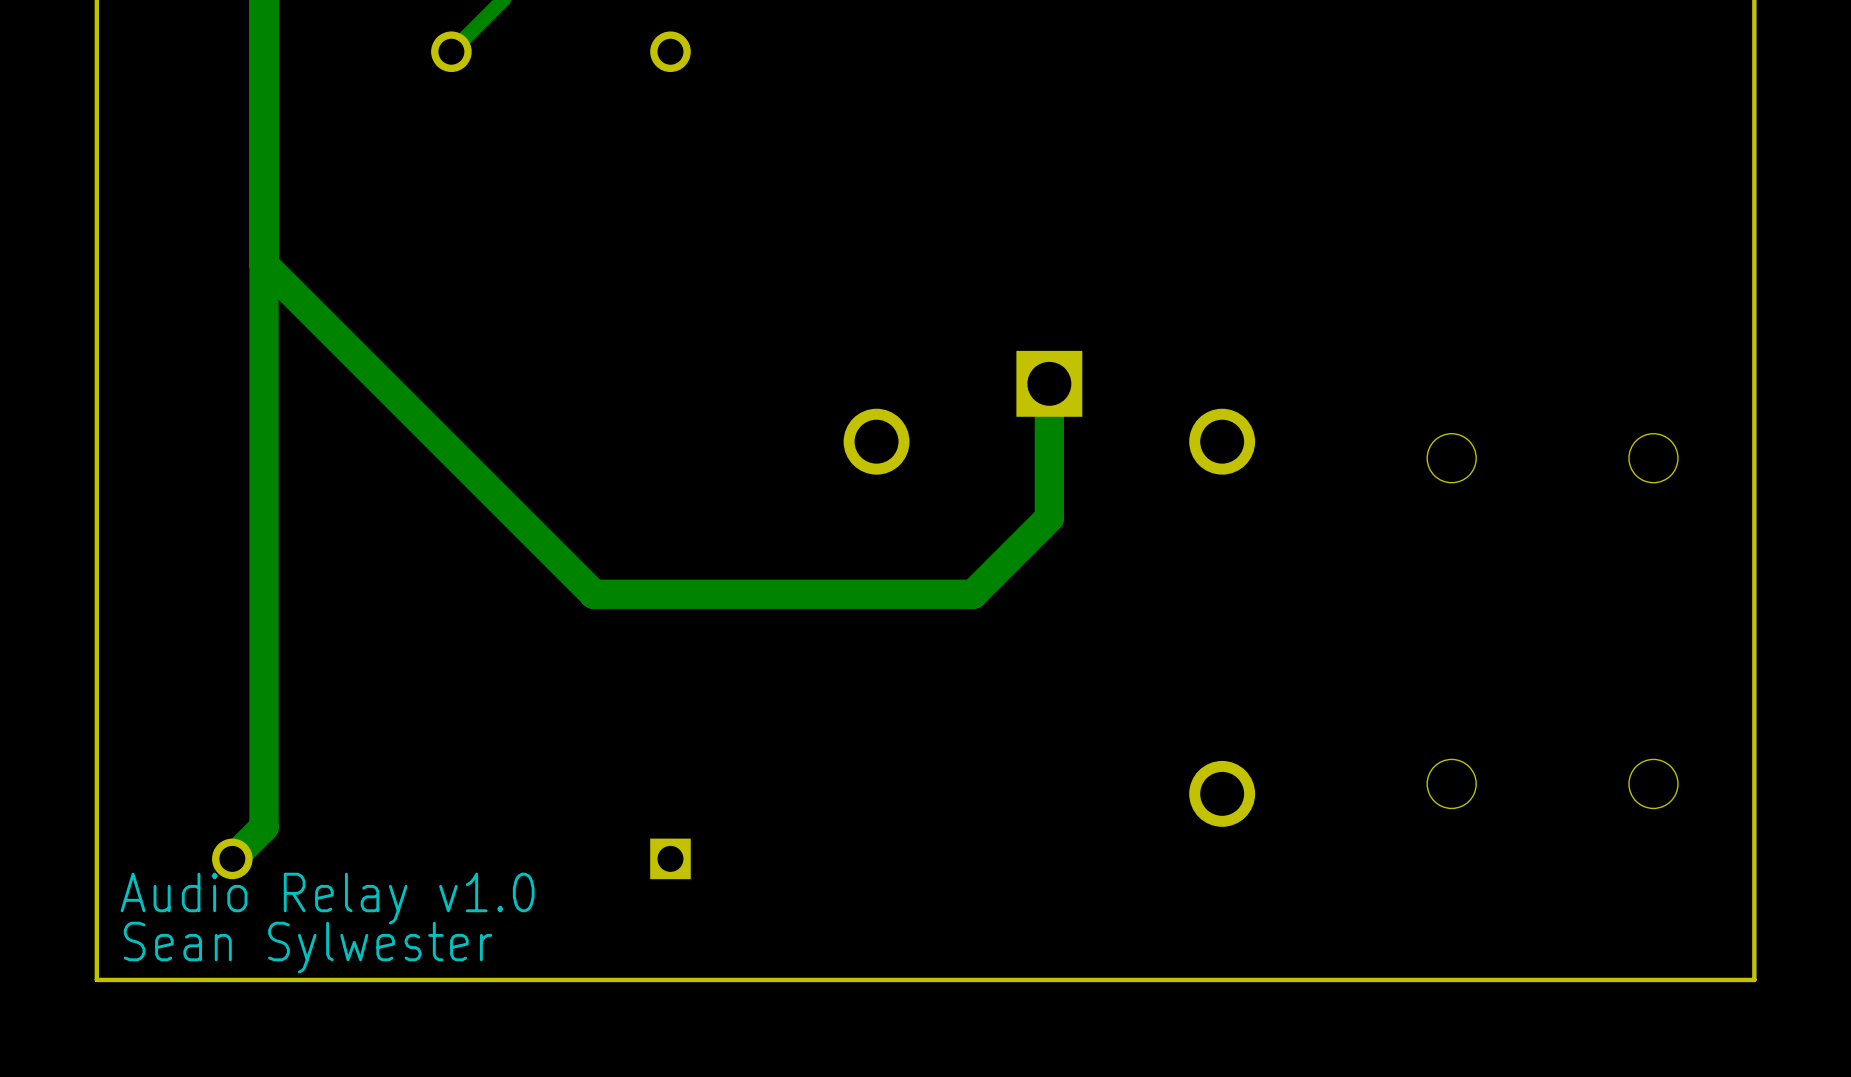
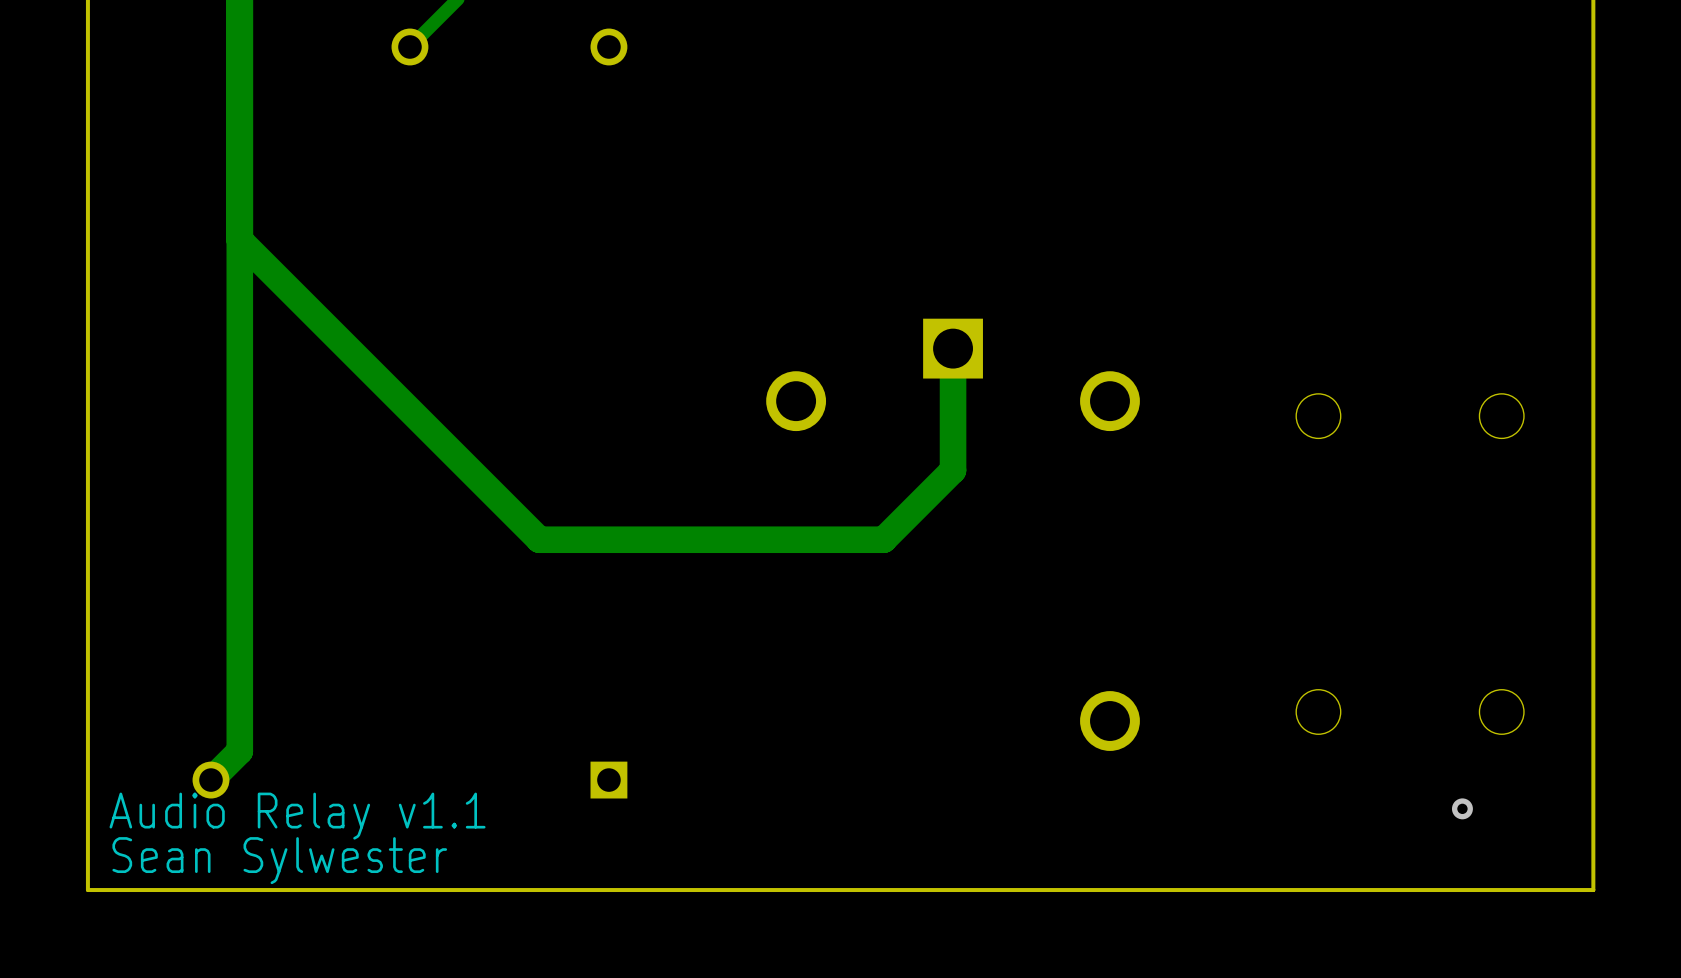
via: none -> (1462, 808)
text: Audio Relay v1.0 (327, 898) -> Audio Relay v1.1 (297, 816)

